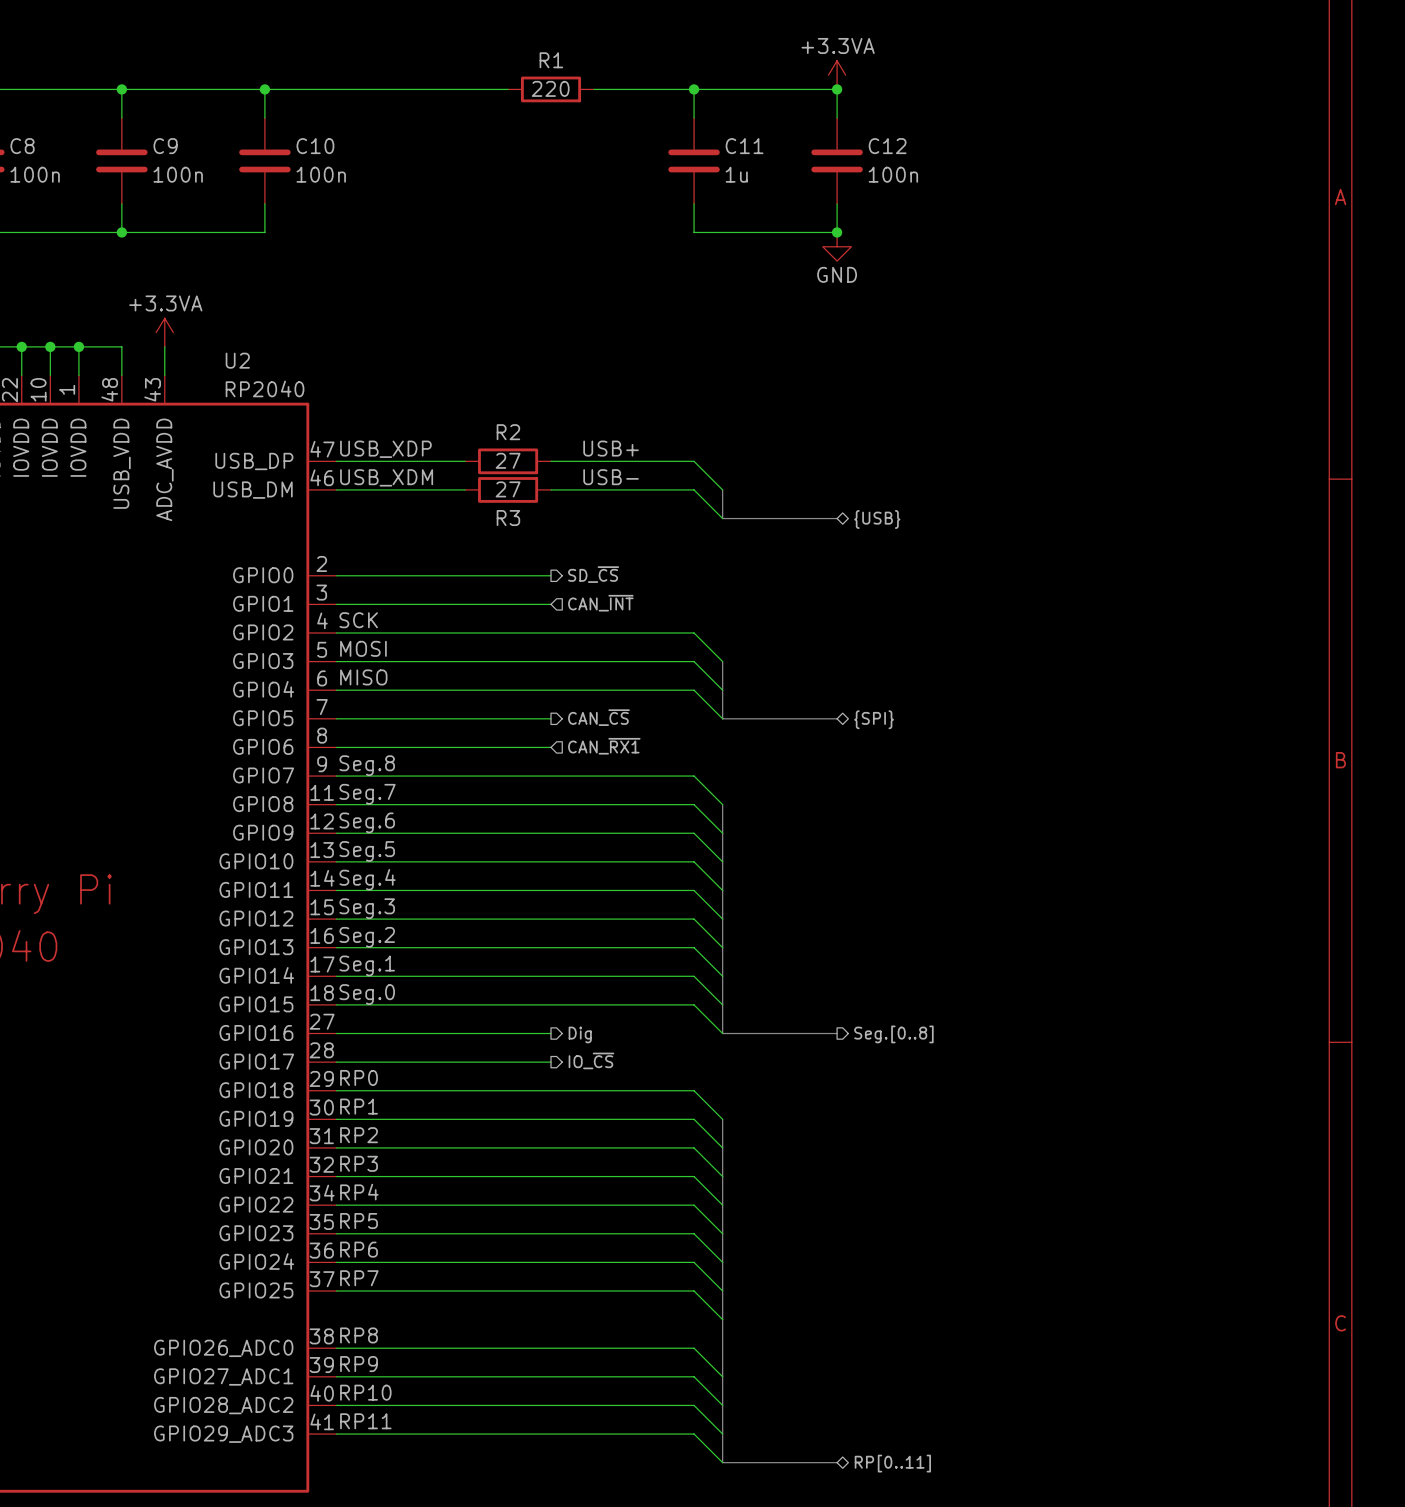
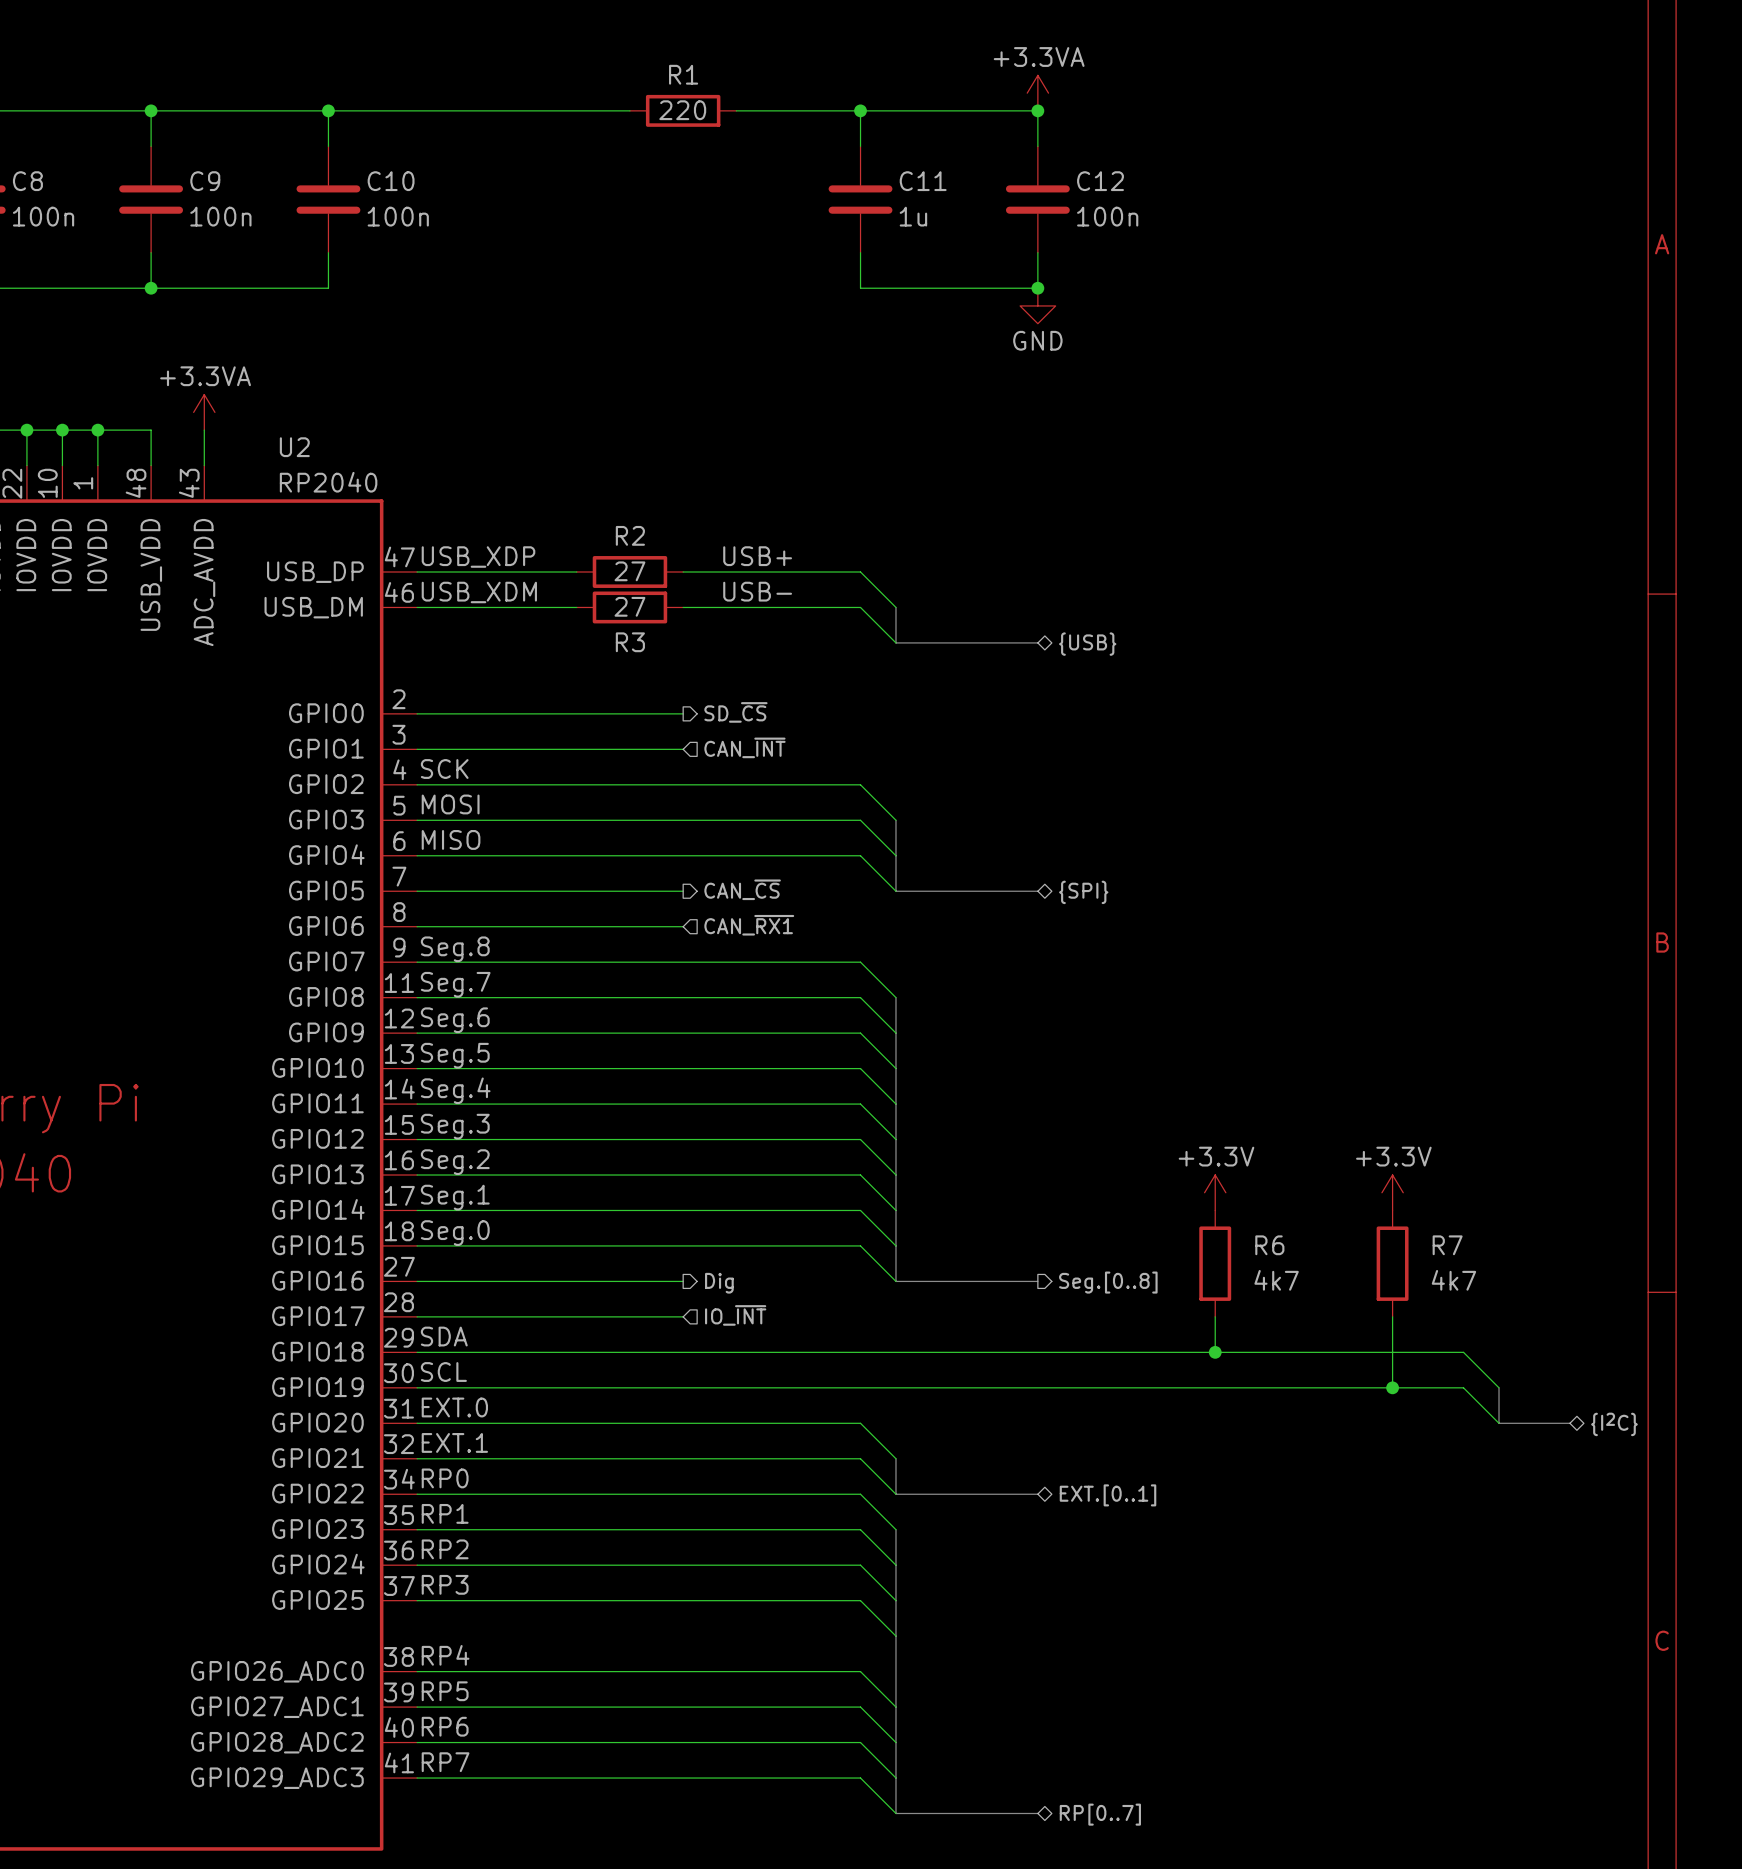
power symbol: none -> +3.3V (1215, 1192)
power symbol: none -> +3.3V (1392, 1192)
R6: none -> 4k7 (1215, 1263)
R7: none -> 4k7 (1392, 1263)
hierarchical label shape: output (591, 1060) -> input (735, 1315)
hierarchical label: IO_~{CS} (591, 1060) -> IO_~{INT} (735, 1315)
wire: none -> (1215, 1316) (1215, 1352)
wire: none -> (1392, 1316) (1392, 1387)
label: RP0 (359, 1077) -> SDA (444, 1336)
wire: (694, 1090) (722, 1119) -> (860, 1352) (1463, 1352) (1499, 1387)
junction: none -> (1215, 1352)
label: RP1 (359, 1106) -> SCL (443, 1372)
wire: (694, 1119) (722, 1147) -> (860, 1387) (1463, 1387) (1499, 1423)
bus: (722, 1119) (722, 1176) -> none
junction: none -> (1392, 1387)
bus: none -> (1499, 1387) (1499, 1423) (1569, 1423)
label: RP2 (359, 1135) -> EXT.0 (454, 1407)
hierarchical label: none -> {I2C} (1614, 1424)
label: RP3 (359, 1163) -> EXT.1 (454, 1442)
label: RP4 (359, 1192) -> RP0 (445, 1478)
bus: (722, 1205) (722, 1233) -> (895, 1494) (1037, 1494)
hierarchical label: none -> EXT.[0..1] (1108, 1495)
label: RP5 (359, 1221) -> RP1 (445, 1513)
label: RP6 (359, 1249) -> RP2 (445, 1549)
label: RP7 (359, 1278) -> RP3 (445, 1584)
label: RP8 (359, 1335) -> RP4 (445, 1655)
label: RP9 (359, 1364) -> RP5 (445, 1691)
label: RP10 (365, 1392) -> RP6 (445, 1726)
label: RP11 (365, 1421) -> RP7 (445, 1762)
hierarchical label: RP[0..11] (892, 1463) -> RP[0..7] (1100, 1814)

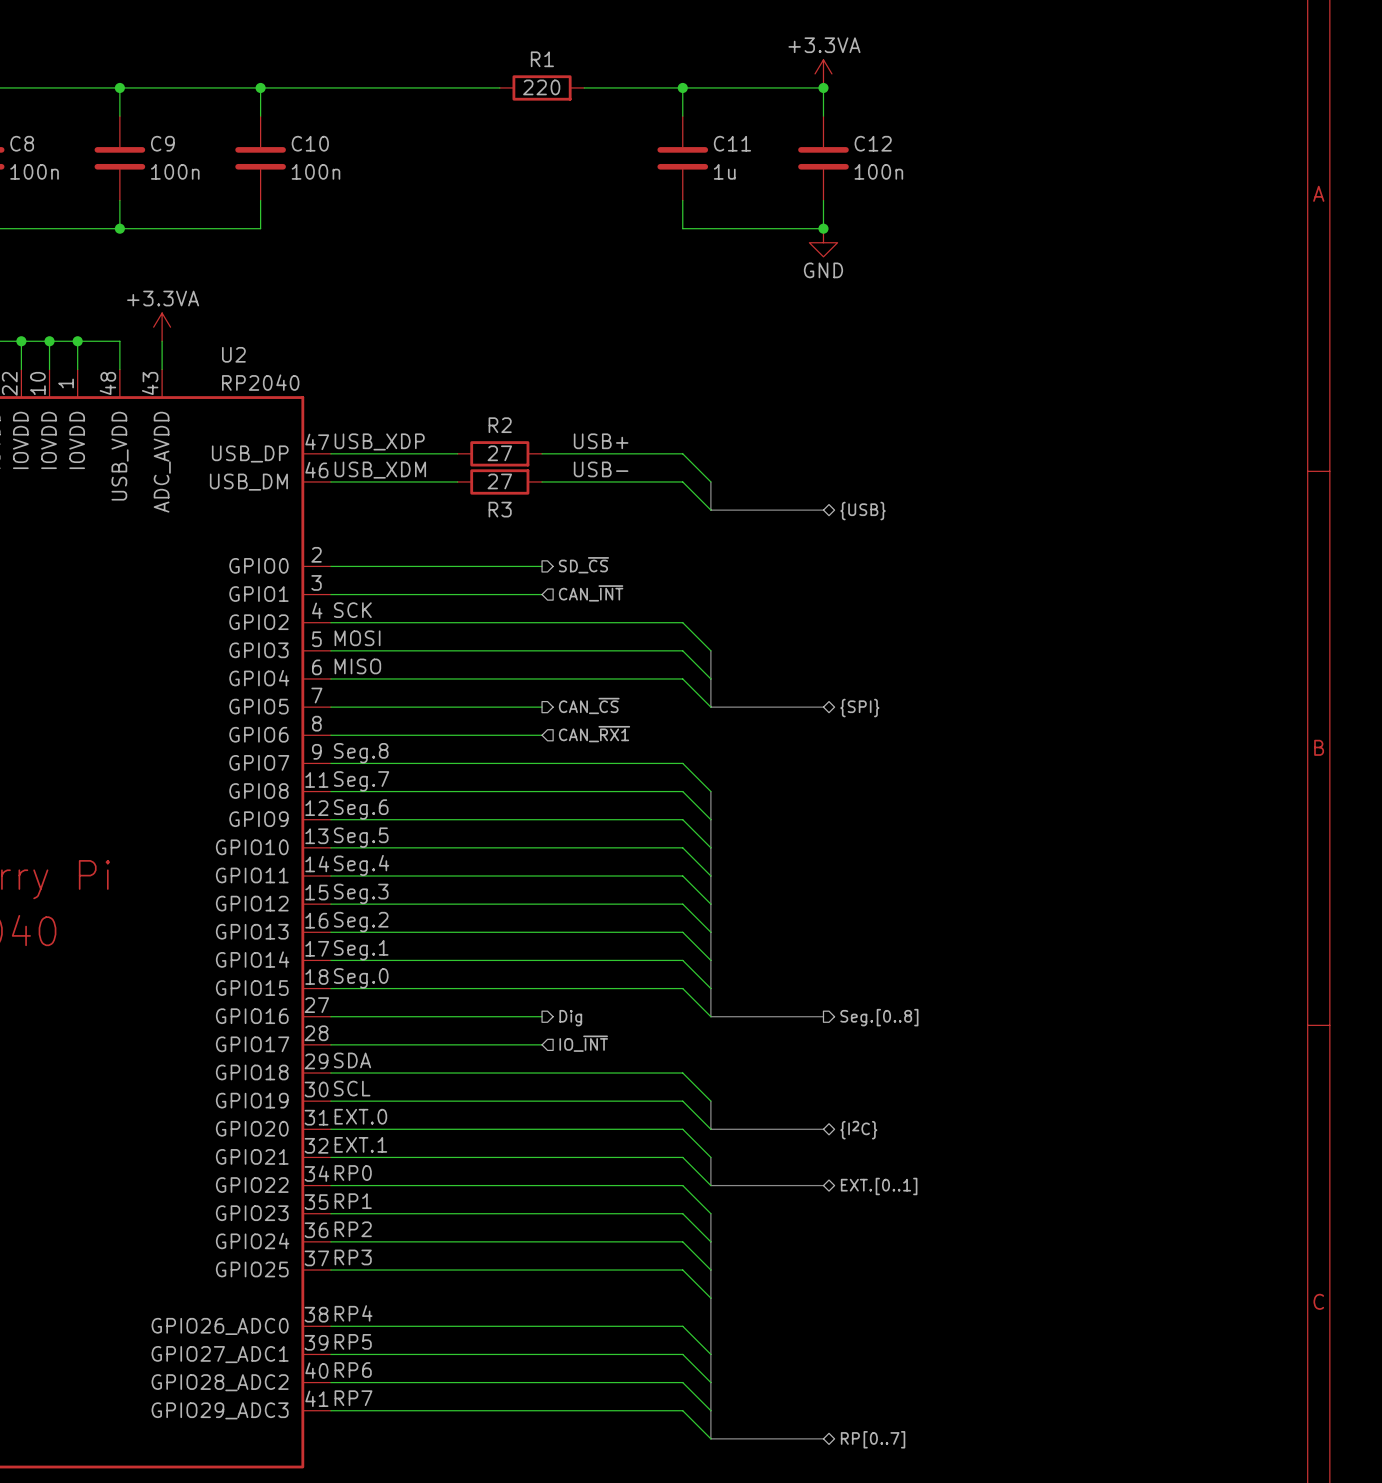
power symbol: +3.3V (1215, 1192) -> none
power symbol: +3.3V (1392, 1192) -> none
R6: 4k7 (1215, 1263) -> none
R7: 4k7 (1392, 1263) -> none
wire: (1215, 1316) (1215, 1352) -> none
wire: (1392, 1316) (1392, 1387) -> none
wire: (860, 1352) (1463, 1352) (1499, 1387) -> (682, 1073) (710, 1101)
junction: (1215, 1352) -> none
wire: (860, 1387) (1463, 1387) (1499, 1423) -> (682, 1101) (710, 1129)
bus: none -> (710, 1101) (710, 1129) (823, 1129)
junction: (1392, 1387) -> none
bus: (1499, 1387) (1499, 1423) (1569, 1423) -> none
hierarchical label: none -> {I2C} (858, 1130)
hierarchical label: {I2C} (1614, 1424) -> none

